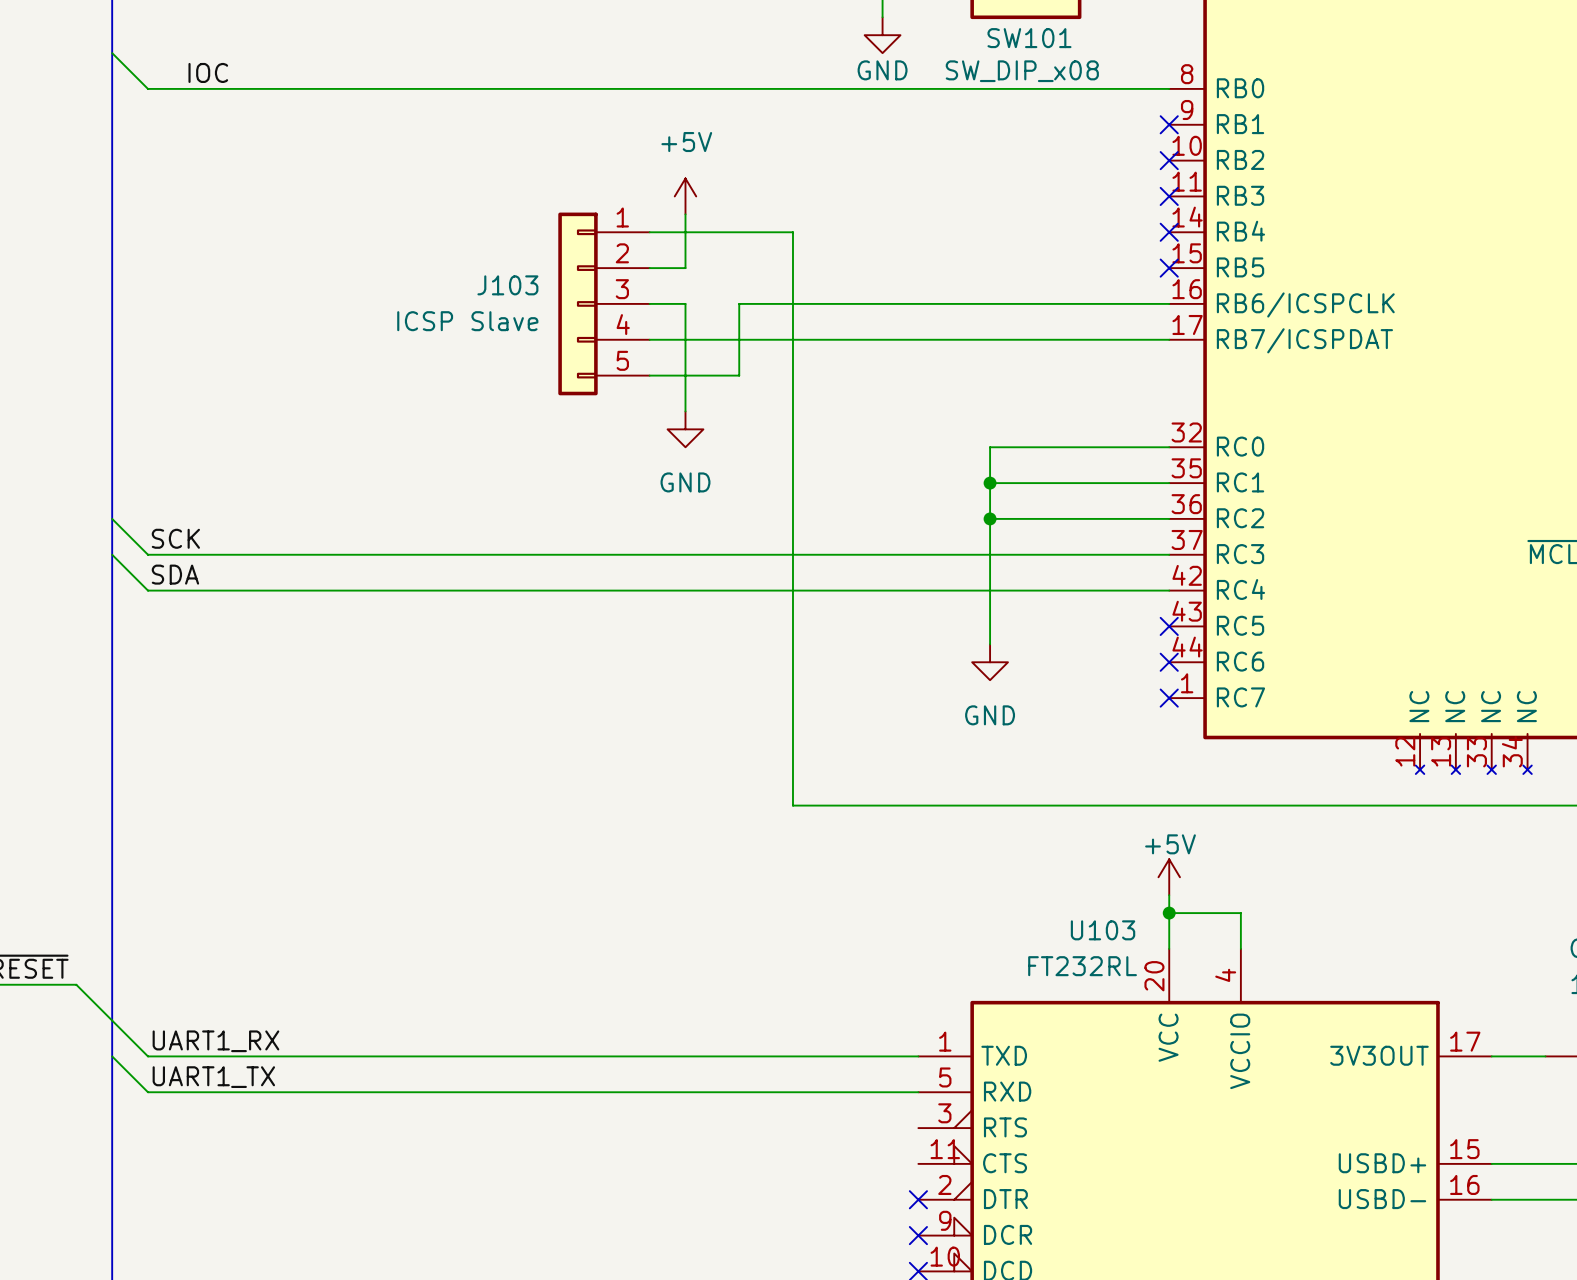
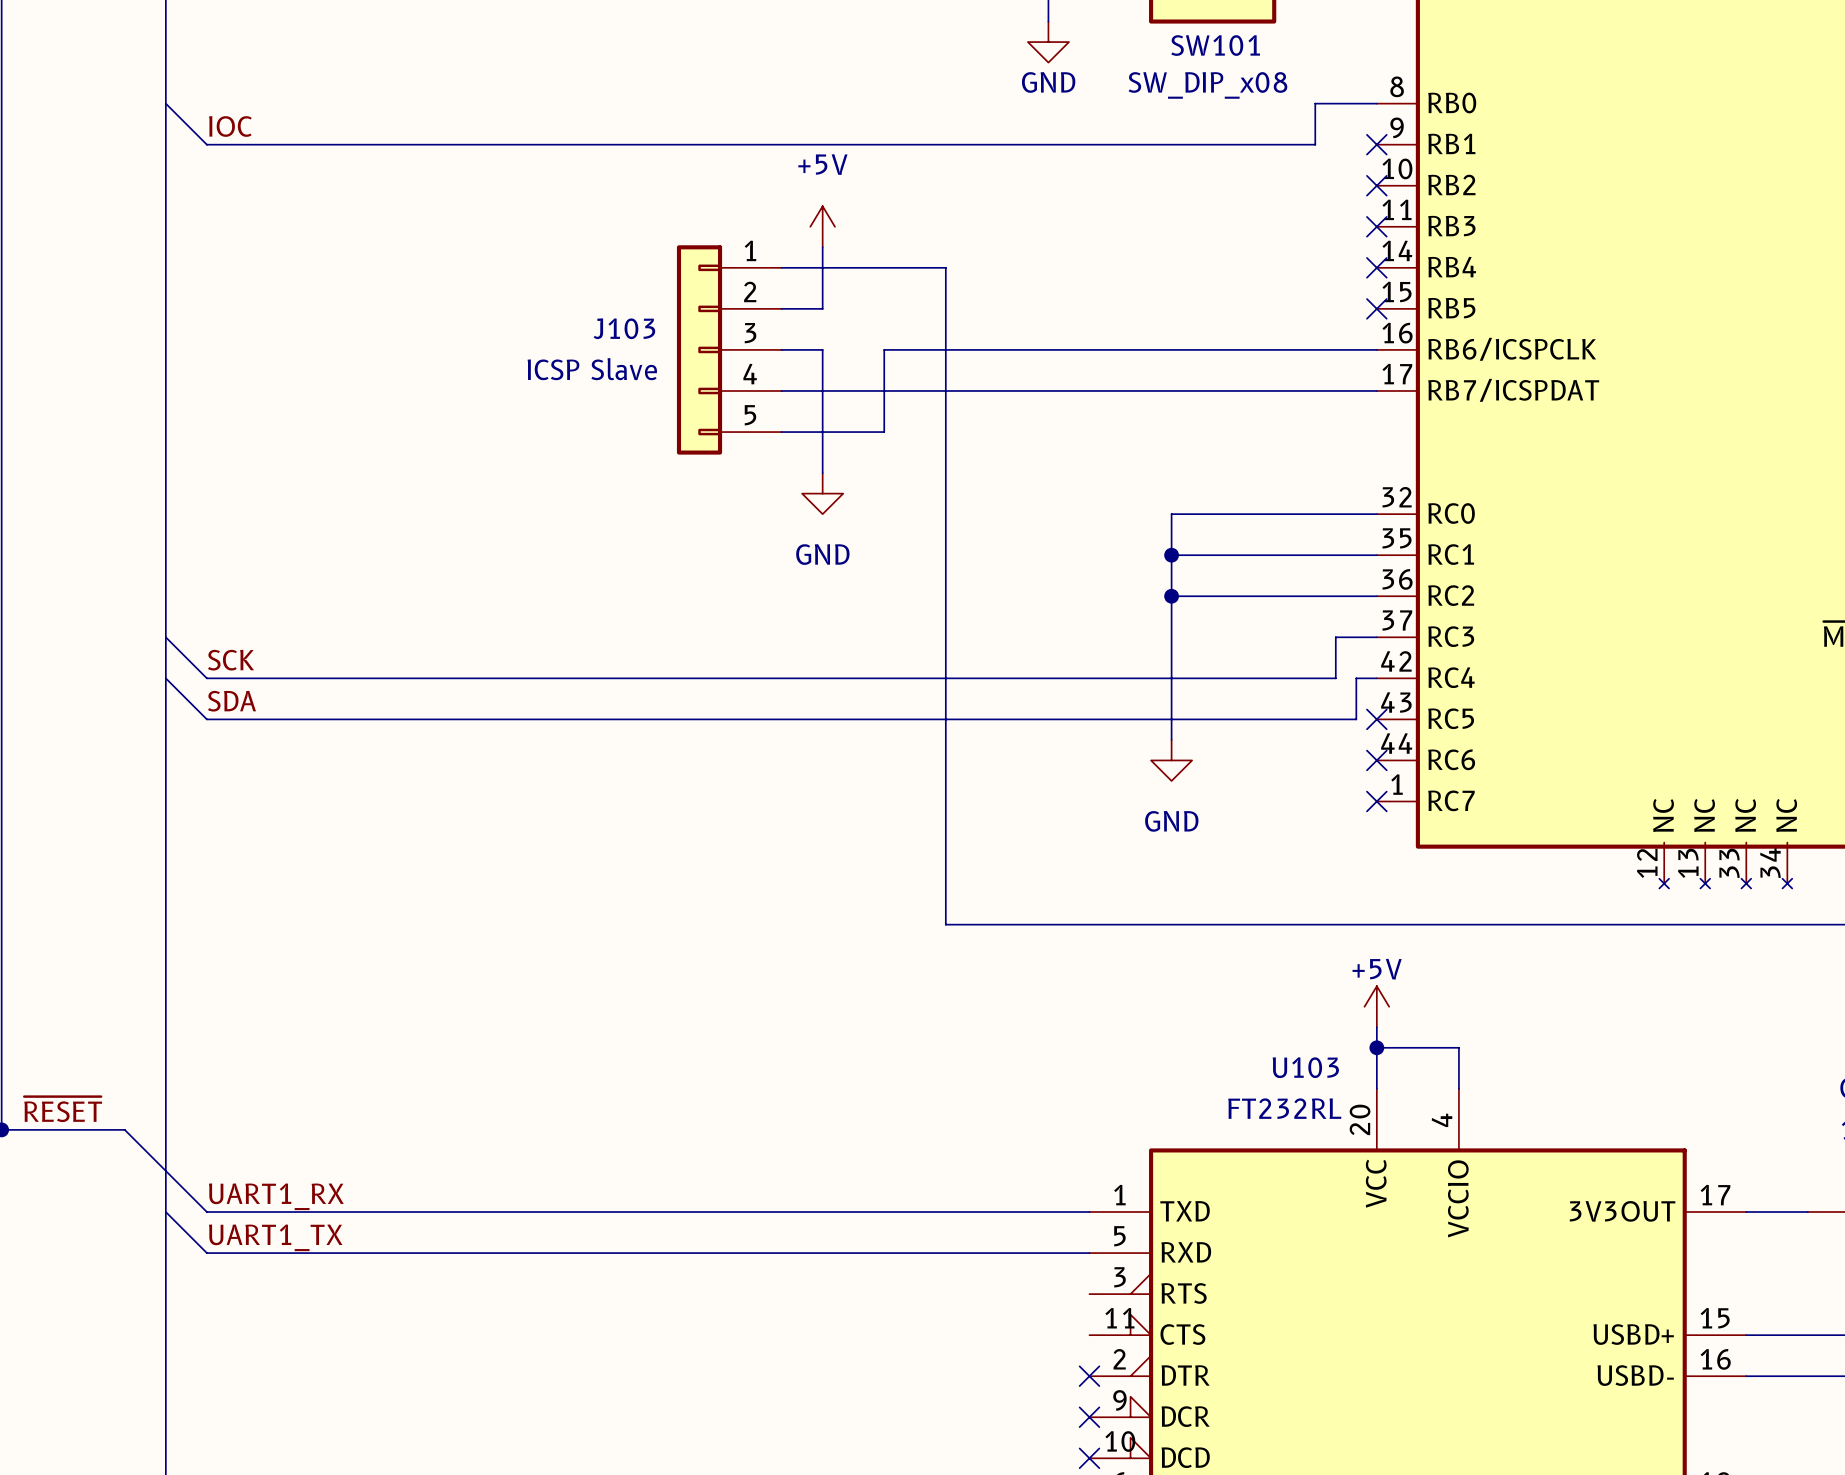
wire: (112, 53) (148, 88) (1115, 88) -> (165, 103) (206, 144) (1315, 144) (1315, 103)
label position: IOC (208, 72) -> IOC (230, 126)
wire: (112, 518) (148, 554) (1133, 554) -> none
label: SCK (175, 538) -> none
label: SDA (175, 574) -> SCK (231, 660)
wire: none -> (165, 678) (206, 719) (1356, 719) (1356, 678)
wire: (1133, 590) (1151, 590) -> (1335, 678) (1335, 637)
label: none -> SDA (231, 701)

